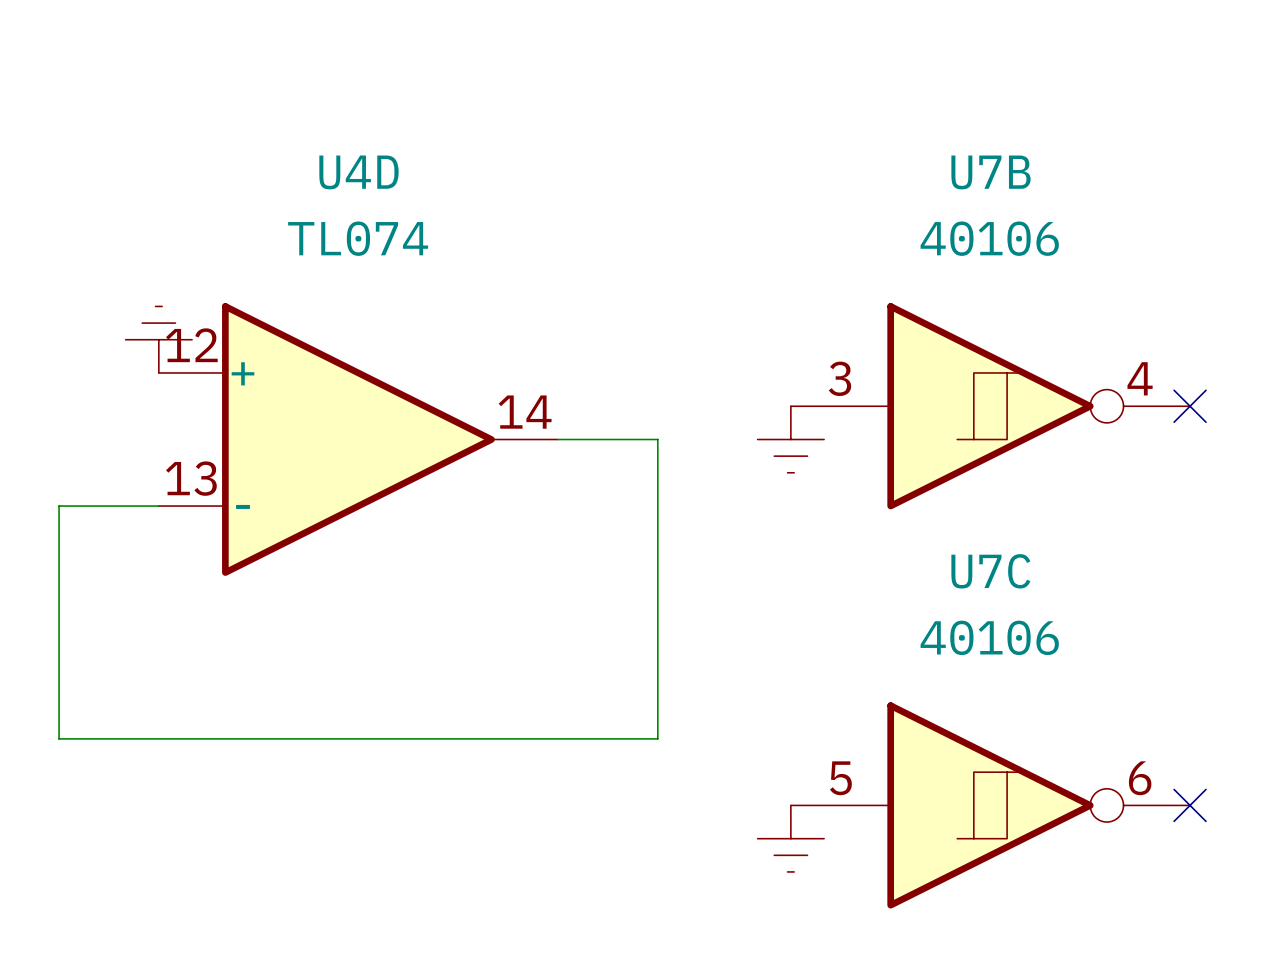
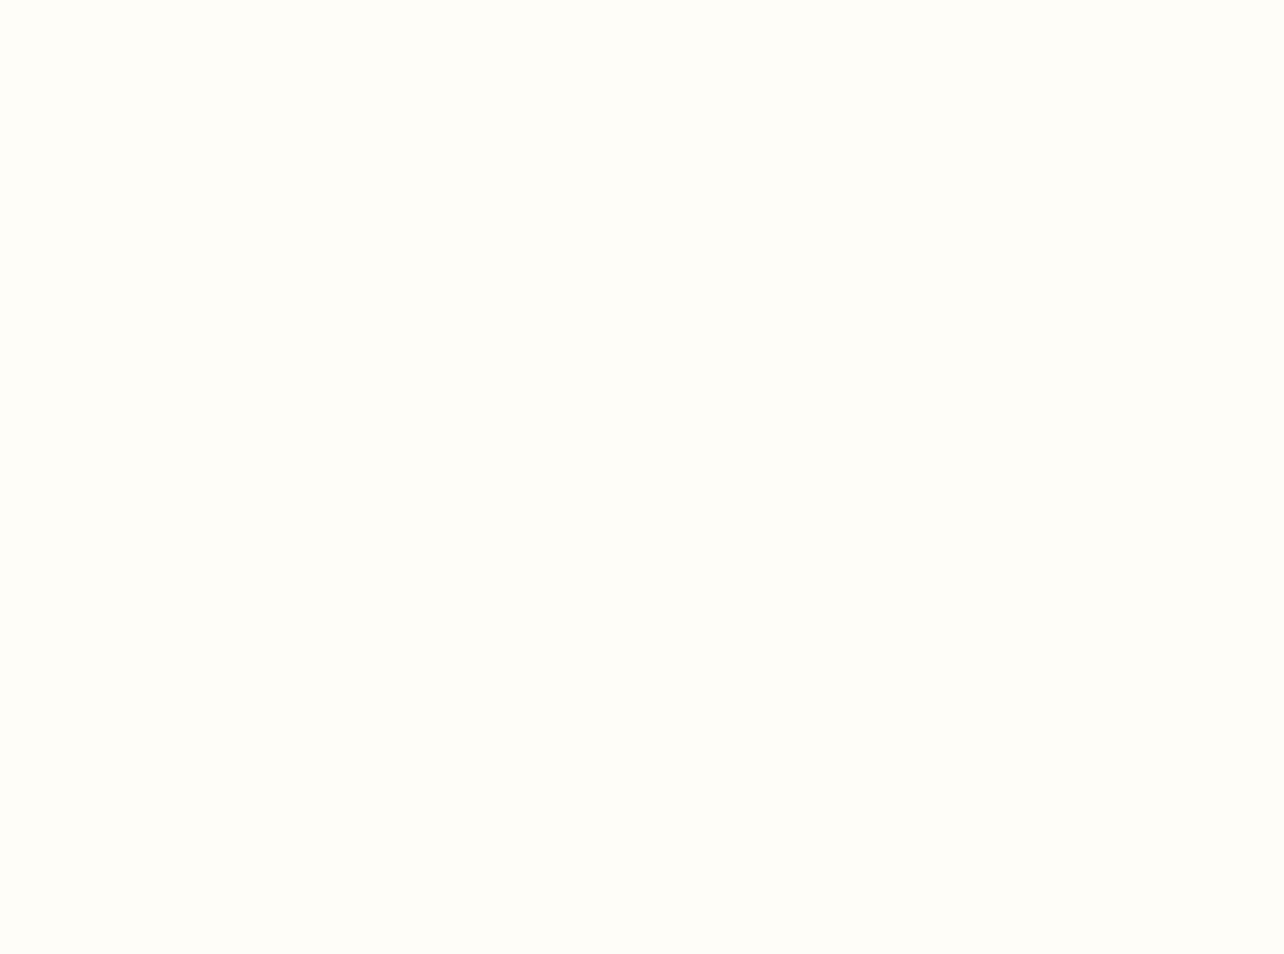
power symbol: (158, 339) -> none
U7B: 40106 (990, 406) -> none
no-connect mark: (1190, 406) -> none
U4D: TL074 (358, 439) -> none
wire: (558, 439) (657, 439) (657, 738) (59, 738) (59, 506) (158, 506) -> none
power symbol: (790, 439) -> none
U7C: 40106 (990, 805) -> none
no-connect mark: (1190, 805) -> none
power symbol: (790, 838) -> none

